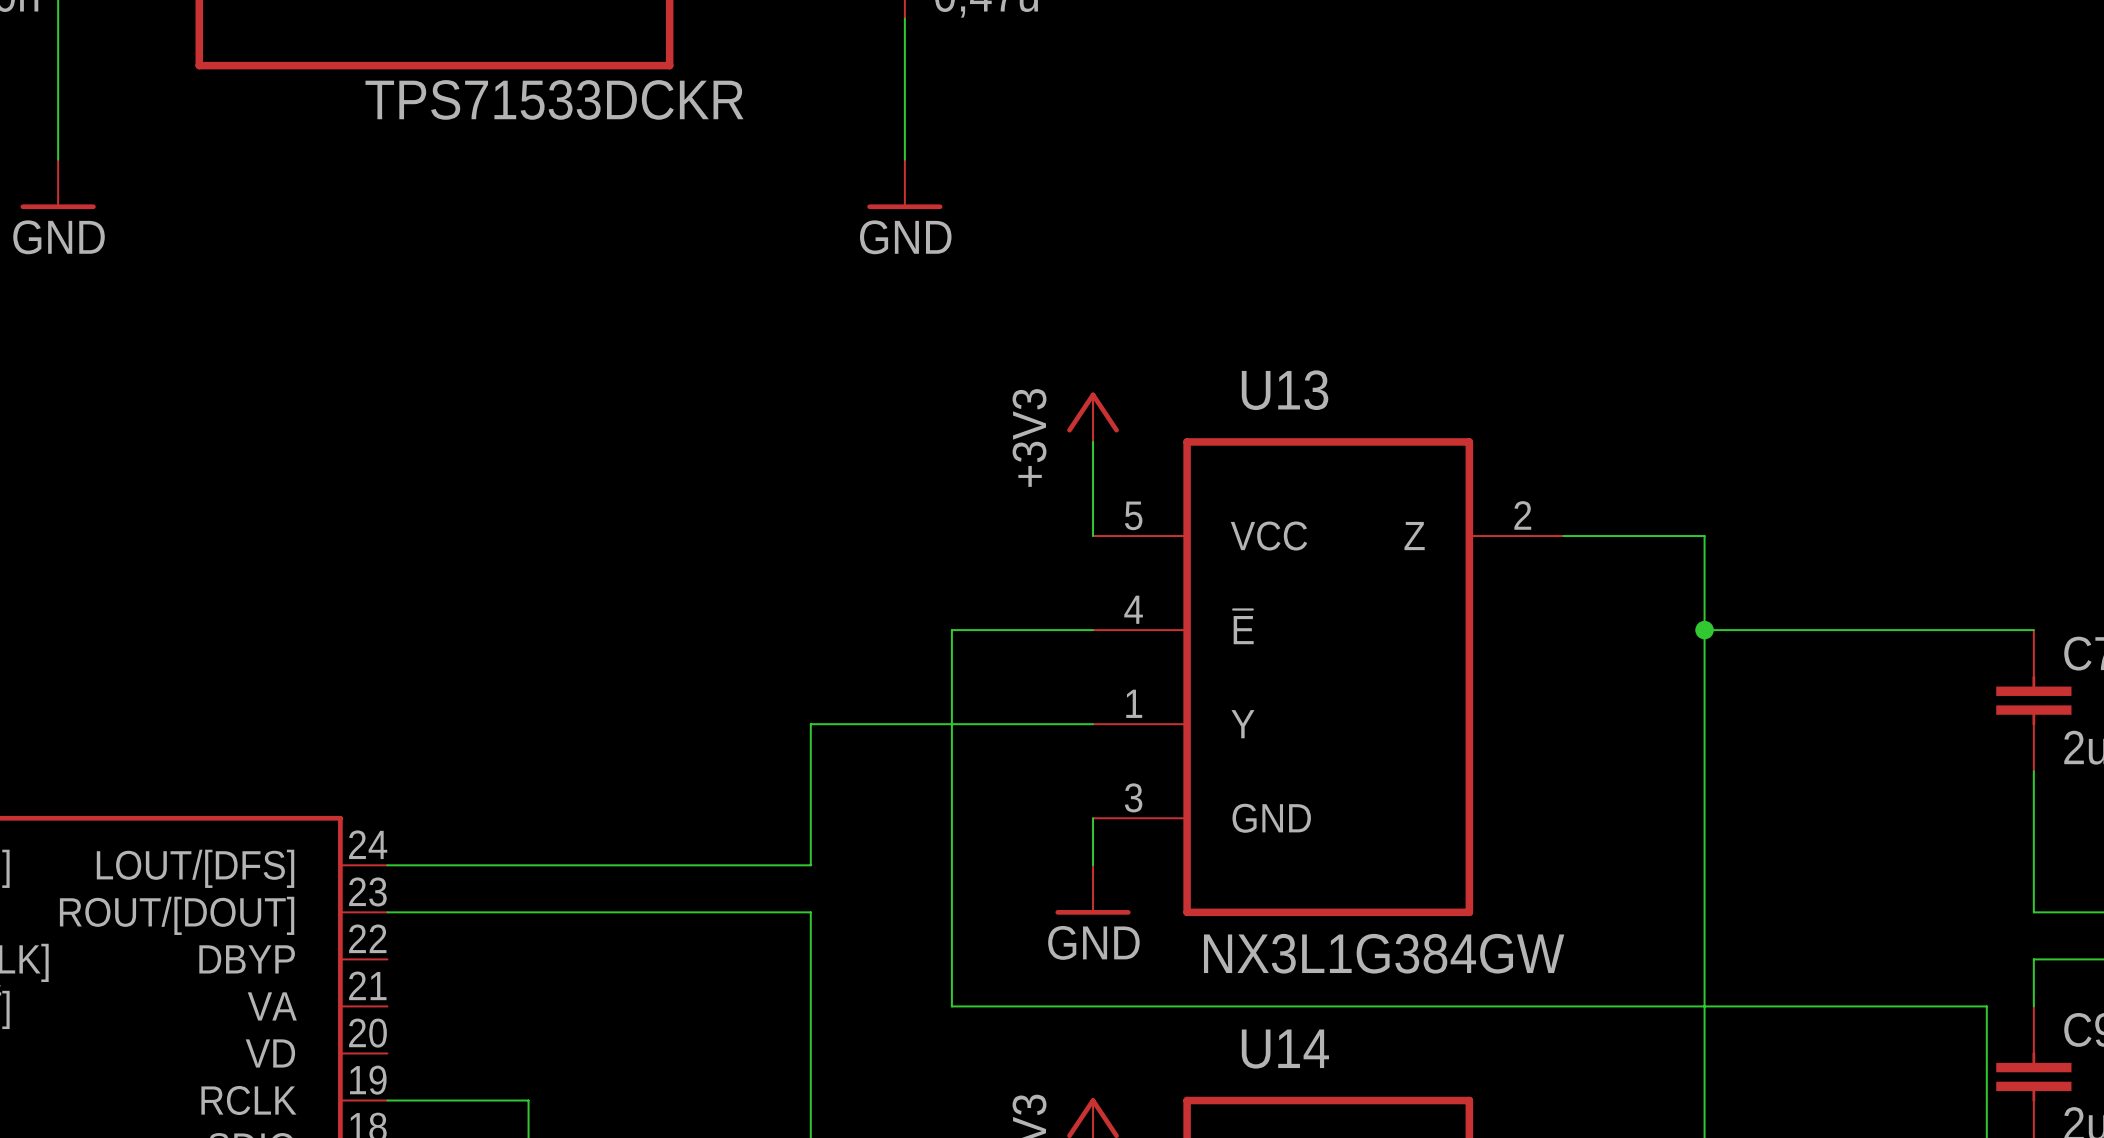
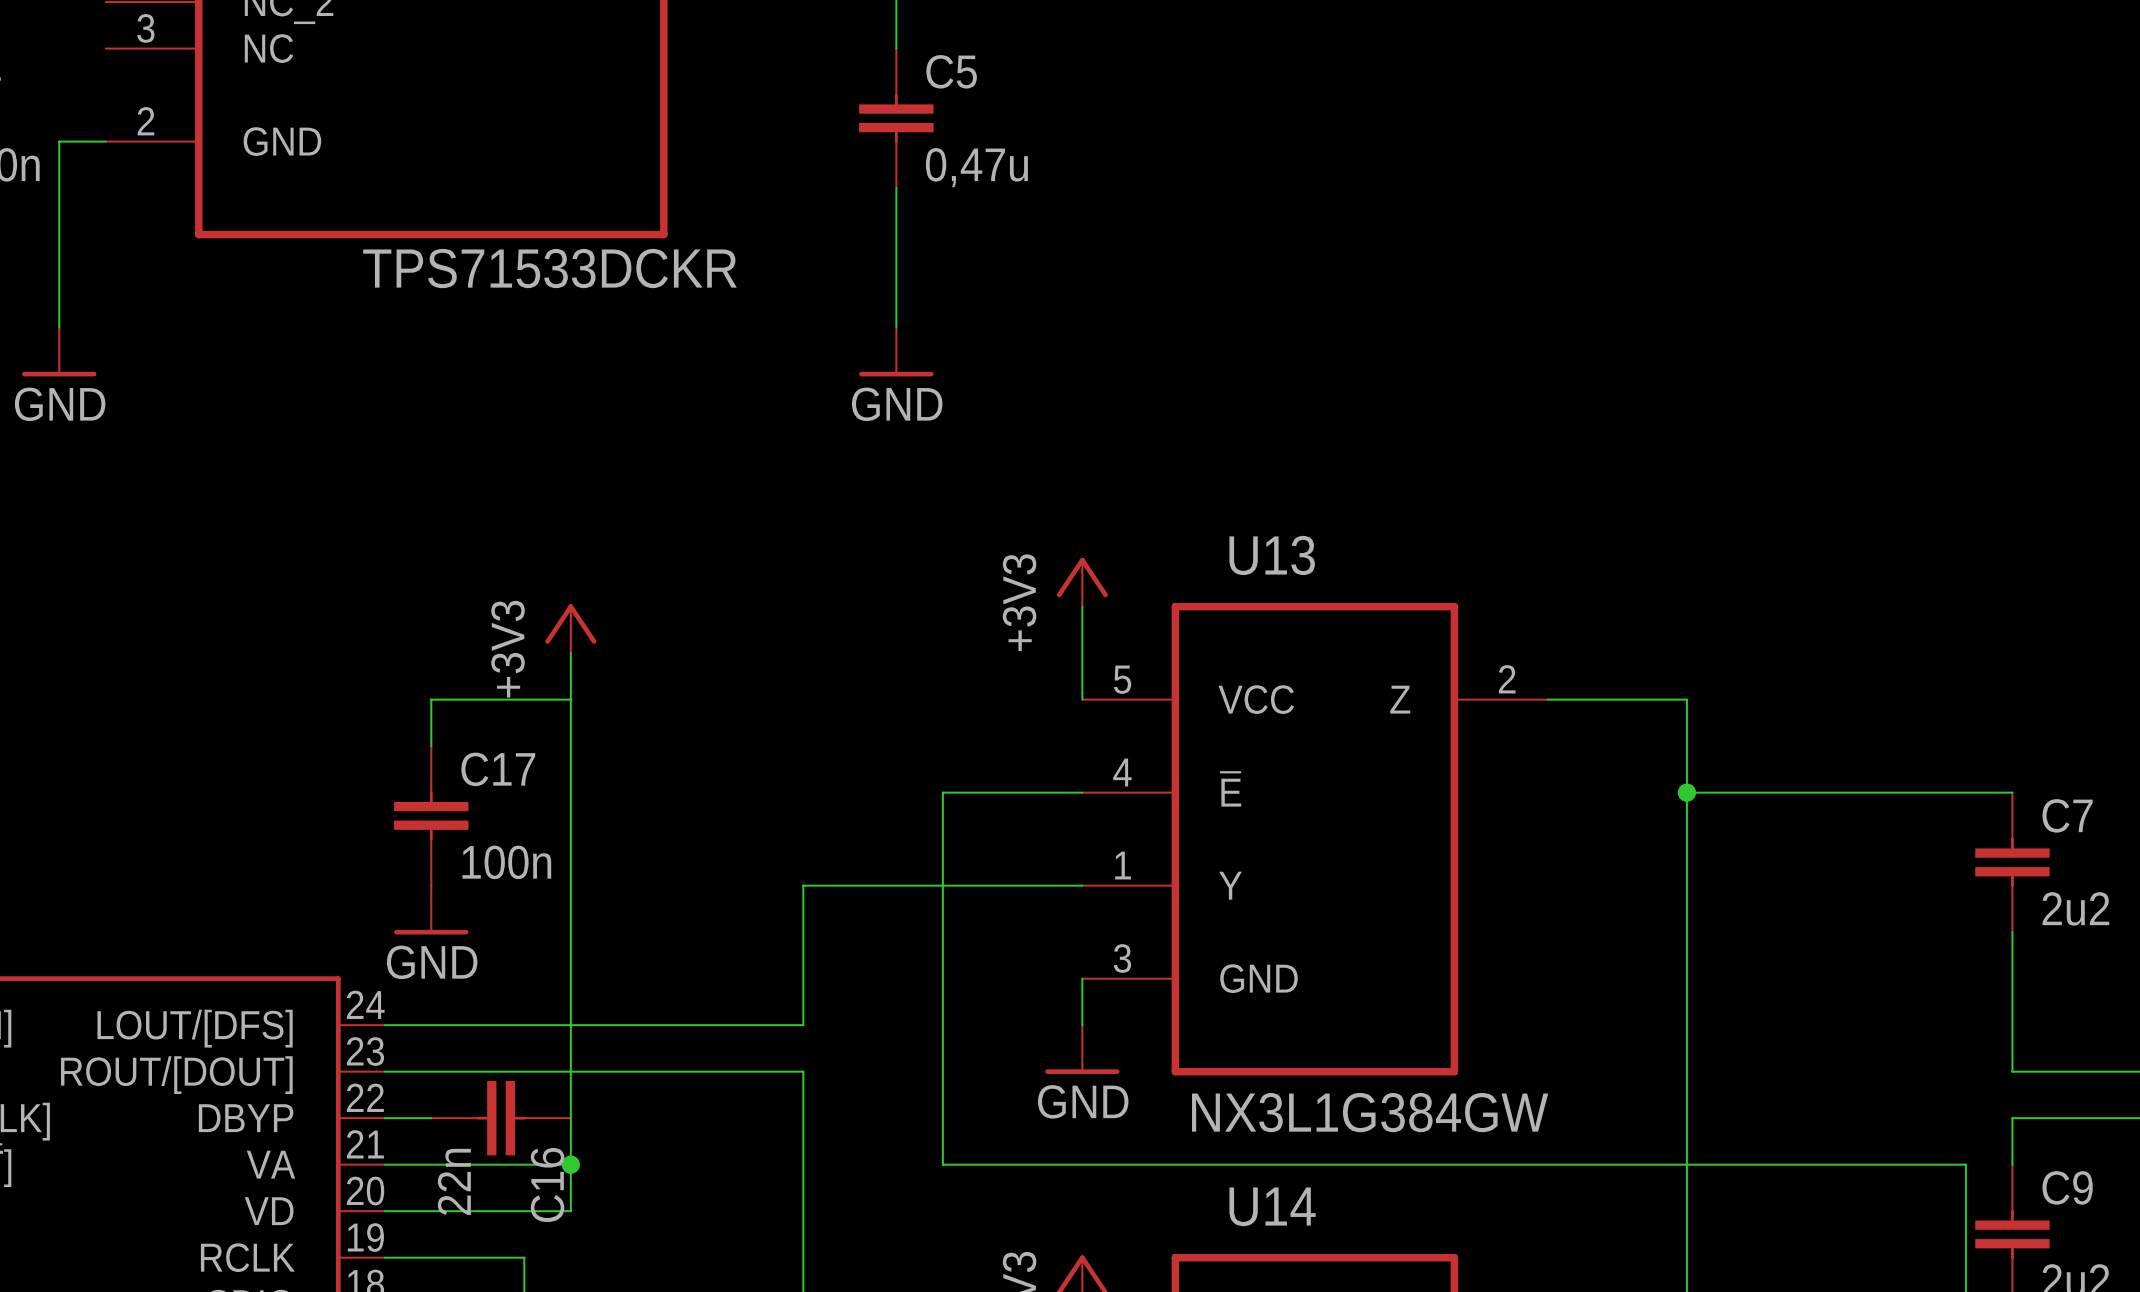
power symbol: none -> +3V3 (570, 628)
wire: none -> (570, 653) (570, 1211) (384, 1211)
wire: none -> (570, 699) (431, 699) (431, 746)
C17: none -> 100n (431, 815)
power symbol: none -> GND (431, 910)
wire: none -> (384, 1118) (431, 1118)
C16: none -> 22n (501, 1118)
wire: none -> (384, 1164) (570, 1164)
junction: none -> (570, 1164)

